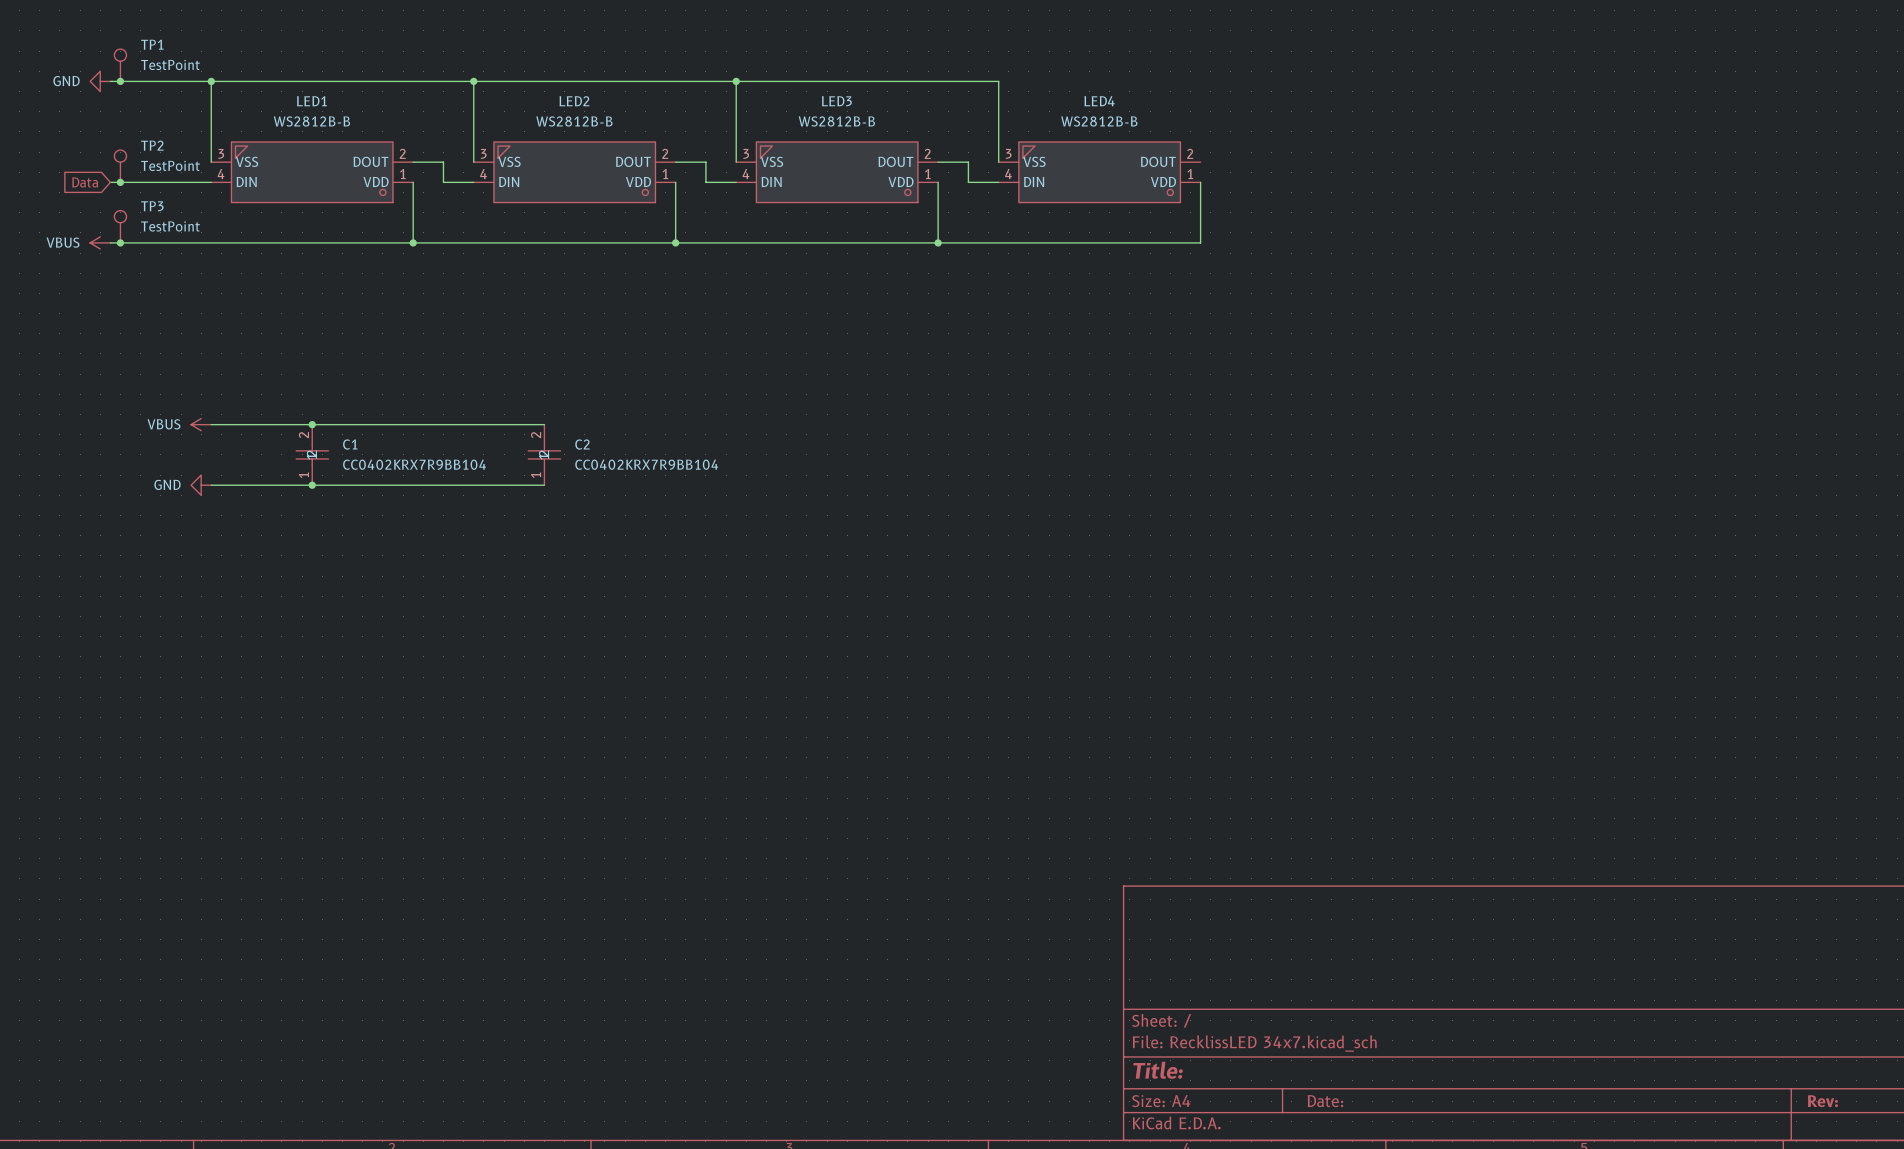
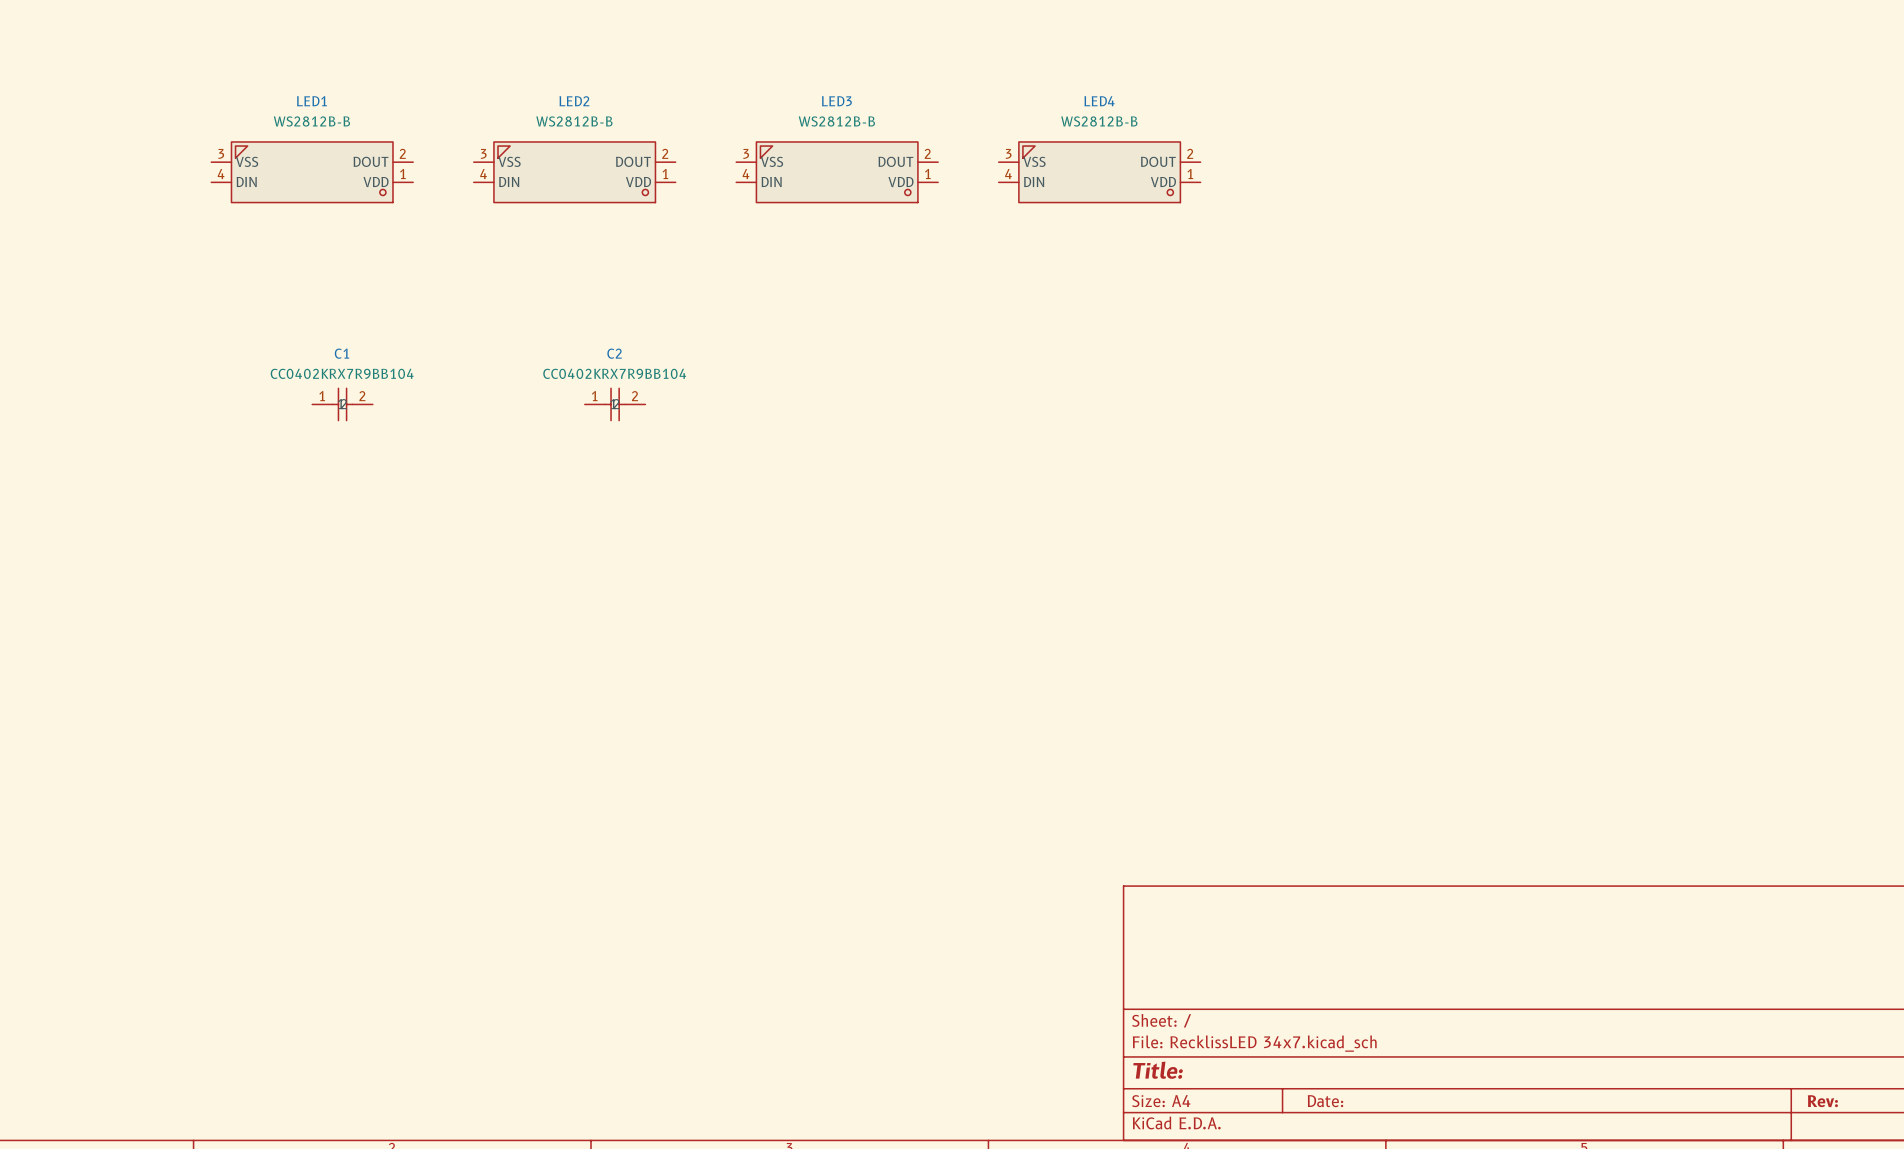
TP1: TestPoint (120, 65) -> none
power symbol: GND (100, 81) -> none
wire: (110, 81) (998, 81) (998, 162) -> none
junction: (120, 81) -> none
wire: (211, 81) (211, 162) -> none
junction: (211, 81) -> none
wire: (473, 81) (473, 162) -> none
junction: (473, 81) -> none
wire: (736, 81) (736, 162) -> none
junction: (736, 81) -> none
wire: (413, 162) (443, 162) (443, 182) (473, 182) -> none
wire: (675, 162) (705, 162) (705, 182) (736, 182) -> none
wire: (938, 162) (968, 162) (968, 182) (998, 182) -> none
TP2: TestPoint (120, 166) -> none
global label: Data (85, 182) -> none
wire: (110, 182) (211, 182) -> none
junction: (120, 182) -> none
wire: (413, 182) (413, 242) -> none
wire: (675, 182) (675, 242) -> none
wire: (938, 182) (938, 242) -> none
wire: (1200, 182) (1200, 242) (110, 242) -> none
TP3: TestPoint (120, 226) -> none
power symbol: VBUS (100, 242) -> none
junction: (120, 242) -> none
junction: (413, 242) -> none
junction: (675, 242) -> none
junction: (938, 242) -> none
power symbol: VBUS (201, 424) -> none
wire: (211, 424) (544, 424) -> none
junction: (312, 424) -> none
C1 name position: C1 (350, 444) -> C1 (341, 353)
C2 name position: C2 (582, 444) -> C2 (614, 353)
C1 rotation: 0° (312, 454) -> 90° clockwise (342, 404)
C1 position: (312, 454) -> (342, 404)
C2 rotation: 0° (544, 454) -> 90° clockwise (615, 404)
C2 position: (544, 454) -> (615, 404)
C1 value position: CC0402KRX7R9BB104 (414, 464) -> CC0402KRX7R9BB104 (342, 373)
C2 value position: CC0402KRX7R9BB104 (646, 464) -> CC0402KRX7R9BB104 (614, 373)
power symbol: GND (201, 485) -> none
wire: (211, 485) (544, 485) -> none
junction: (312, 485) -> none

